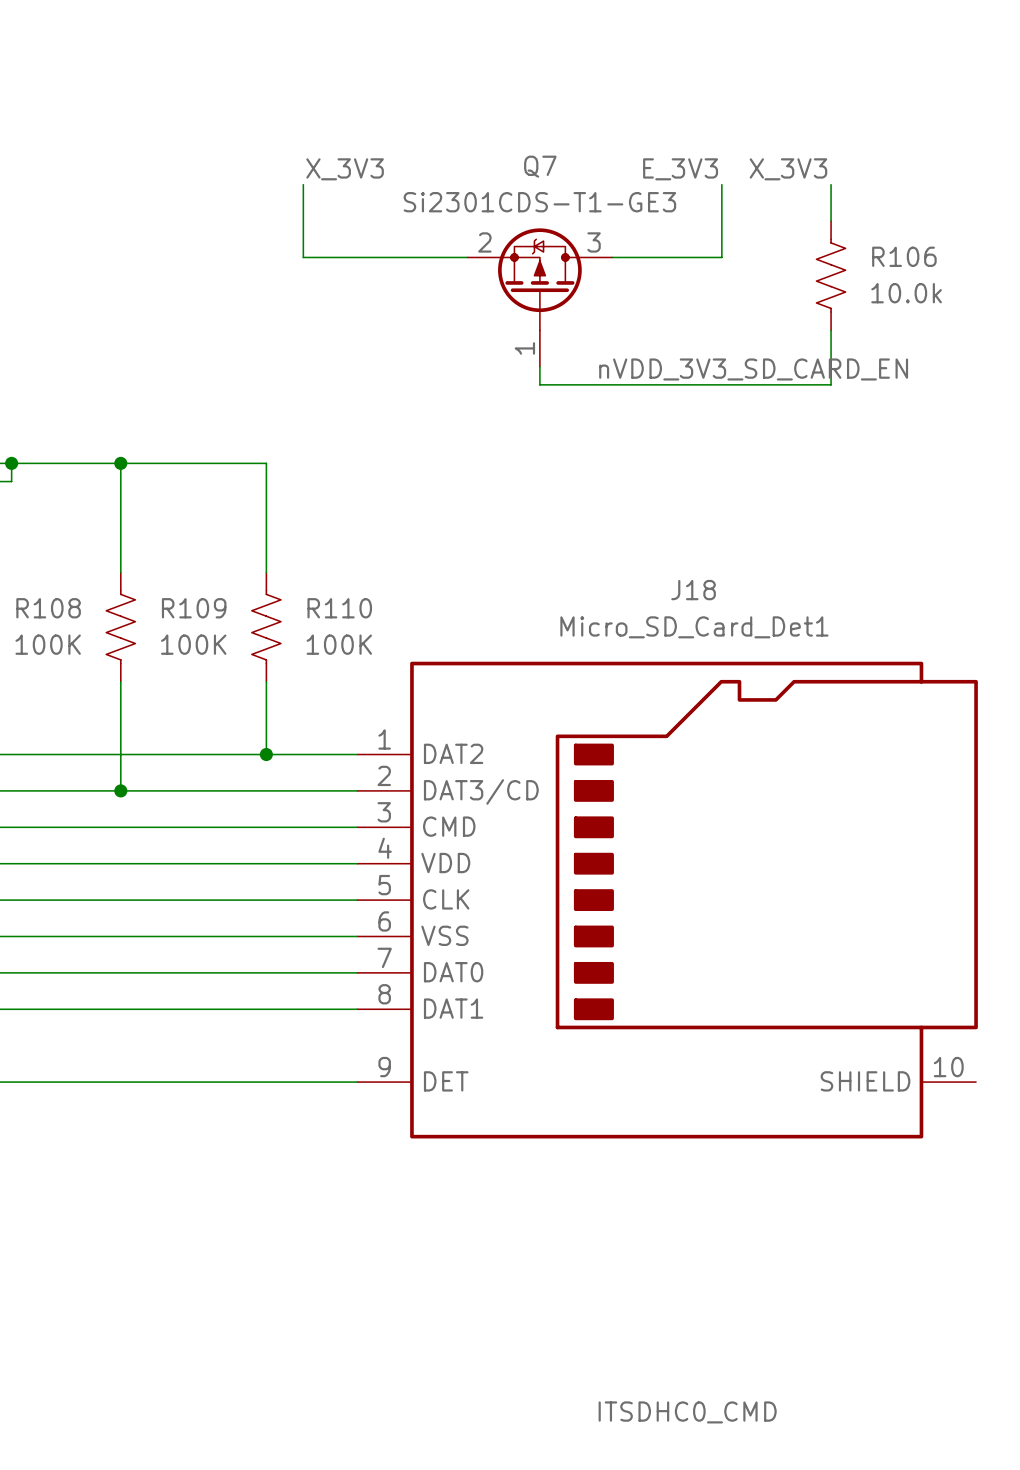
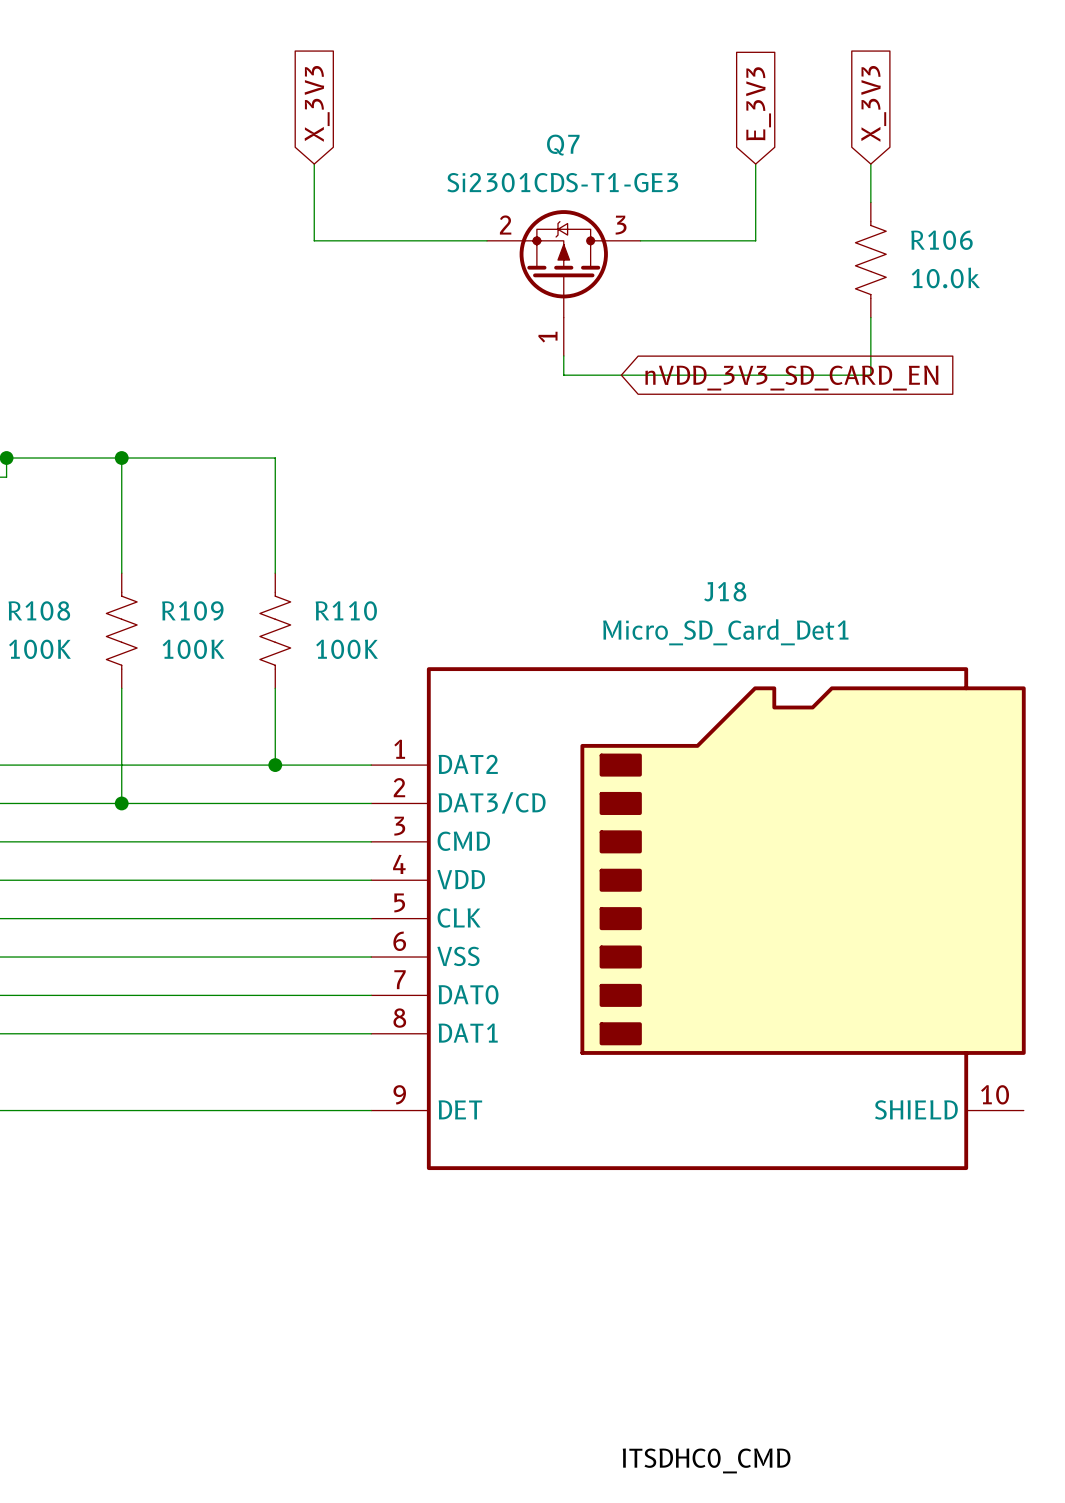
global label: none -> X_3V3 (317, 103)
global label: none -> E_3V3 (758, 103)
global label: none -> X_3V3 (873, 103)
label: X_3V3 (345, 169) -> none
label: E_3V3 (680, 169) -> none
label: X_3V3 (788, 169) -> none
label: nVDD_3V3_SD_CARD_EN (753, 369) -> none
global label: none -> nVDD_3V3_SD_CARD_EN (791, 378)

